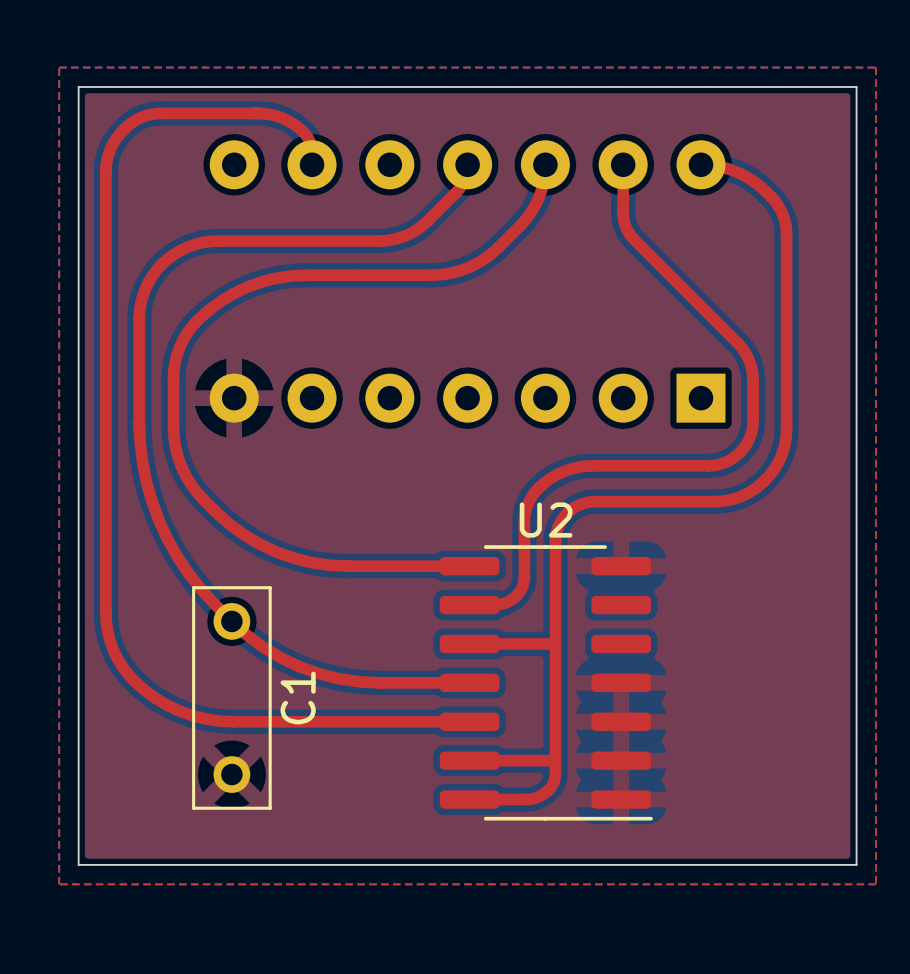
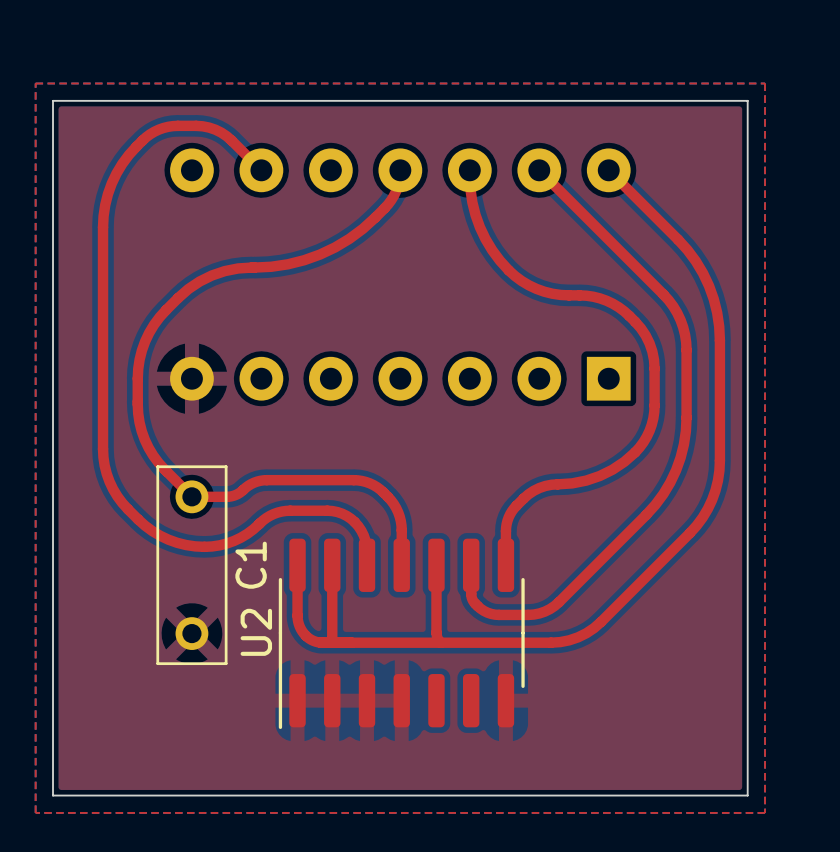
top track: (258, 113) (282, 118) (303, 132) (311, 145) (312, 164) -> (367, 565) (366, 546) (361, 530) (350, 518) (332, 511) (277, 512) (266, 517) (240, 537) (219, 545) (195, 546) (177, 542) (152, 531) (138, 519) (117, 496) (106, 473) (103, 448) (103, 227) (105, 205) (116, 173) (128, 154) (146, 137) (158, 129) (177, 125) (202, 126) (221, 132) (261, 170)
top track: (258, 113) (160, 113) (141, 117) (129, 124) (115, 139) (108, 154) (105, 171) -> none
top track: (467, 164) (464, 179) (456, 192) (422, 225) (399, 238) (379, 241) (210, 241) (187, 247) (167, 259) (152, 276) (140, 303) (139, 432) -> (400, 170) (398, 185) (388, 204) (362, 228) (335, 247) (319, 254) (287, 264) (224, 271) (199, 281) (188, 289) (159, 317) (149, 332) (139, 359) (137, 378)
top track: (545, 164) (541, 189) (535, 205) (525, 219) (491, 253) (467, 267) (449, 273) (431, 275) (291, 275) (247, 286) (221, 301) (197, 320) (183, 339) (175, 362) (173, 397) -> (469, 170) (472, 202) (479, 227) (492, 250) (508, 270) (521, 280) (544, 291) (560, 294) (593, 296) (618, 307) (640, 328) (649, 343) (654, 360) (654, 411) (651, 424) (643, 442) (624, 461) (599, 476) (572, 483) (545, 485) (533, 490) (523, 498) (511, 511) (507, 520) (505, 565)
top track: (623, 164) (623, 216) (629, 233) (737, 342) (746, 355) (752, 375) (753, 420) (751, 433) (739, 452) (730, 459) (719, 464) (585, 466) (563, 471) (550, 478) (535, 491) (526, 508) (524, 522) (524, 579) (519, 591) (513, 598) (502, 603) (469, 605) -> (539, 170) (663, 294) (677, 313) (683, 327) (686, 342) (686, 417) (683, 444) (676, 470) (655, 504) (549, 609) (528, 614) (495, 614) (483, 610) (475, 603) (471, 597) (471, 565)
top track: (700, 164) (727, 168) (752, 180) (774, 200) (784, 218) (786, 234) (786, 429) (781, 456) (774, 468) (763, 481) (749, 492) (733, 499) (715, 501) (590, 501) (575, 506) (567, 513) (558, 526) (555, 541) (555, 773) (553, 782) (545, 792) (534, 798) (469, 799) -> (608, 170) (687, 250) (703, 273) (713, 299) (719, 340) (719, 470) (715, 490) (702, 517) (689, 533) (601, 621) (586, 633) (569, 640) (550, 642) (320, 642)
top track: (105, 167) (105, 612) (110, 640) (121, 666) (133, 680) (155, 698) (179, 711) (205, 719) (233, 721) (469, 721) -> none
top track: (139, 421) (140, 441) (146, 481) (159, 520) (167, 539) (188, 573) (231, 621) -> none
top track: (214, 510) (243, 534) (259, 543) (275, 551) (311, 562) (348, 566) (469, 566) -> (174, 479) (191, 496) (231, 496) (251, 484) (263, 480) (353, 480) (369, 483) (387, 496) (398, 512) (401, 525) (401, 565)
U2 name position: U2 (546, 520) -> U2 (256, 632)
top track: none -> (297, 565) (298, 623) (307, 637) (322, 642)
top track: none -> (332, 565) (333, 642)
top track: none -> (436, 565) (436, 632) (440, 642)
top track: (231, 621) (263, 647) (299, 666) (319, 673) (359, 681) (469, 682) -> none
top track: (469, 643) (551, 643) -> none
U2 rotation: 0° (546, 682) -> 90° clockwise (401, 633)
C1 position: (231, 697) -> (191, 565)
top track: (469, 760) (555, 760) -> none

